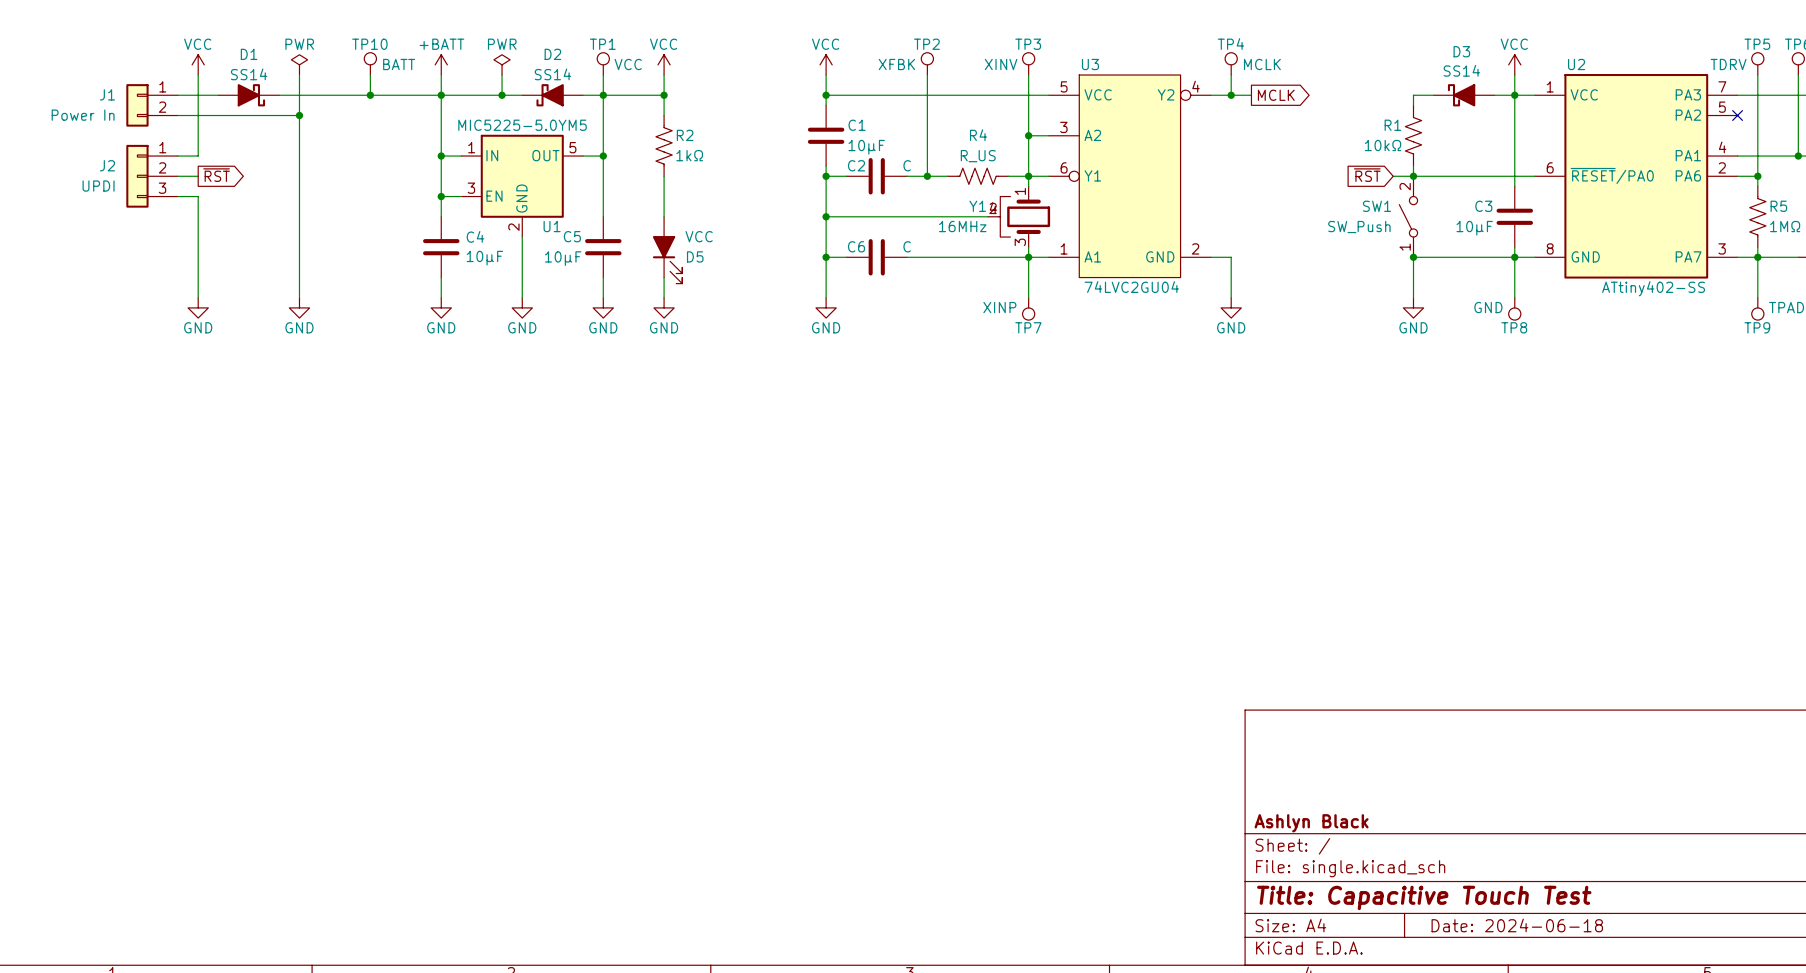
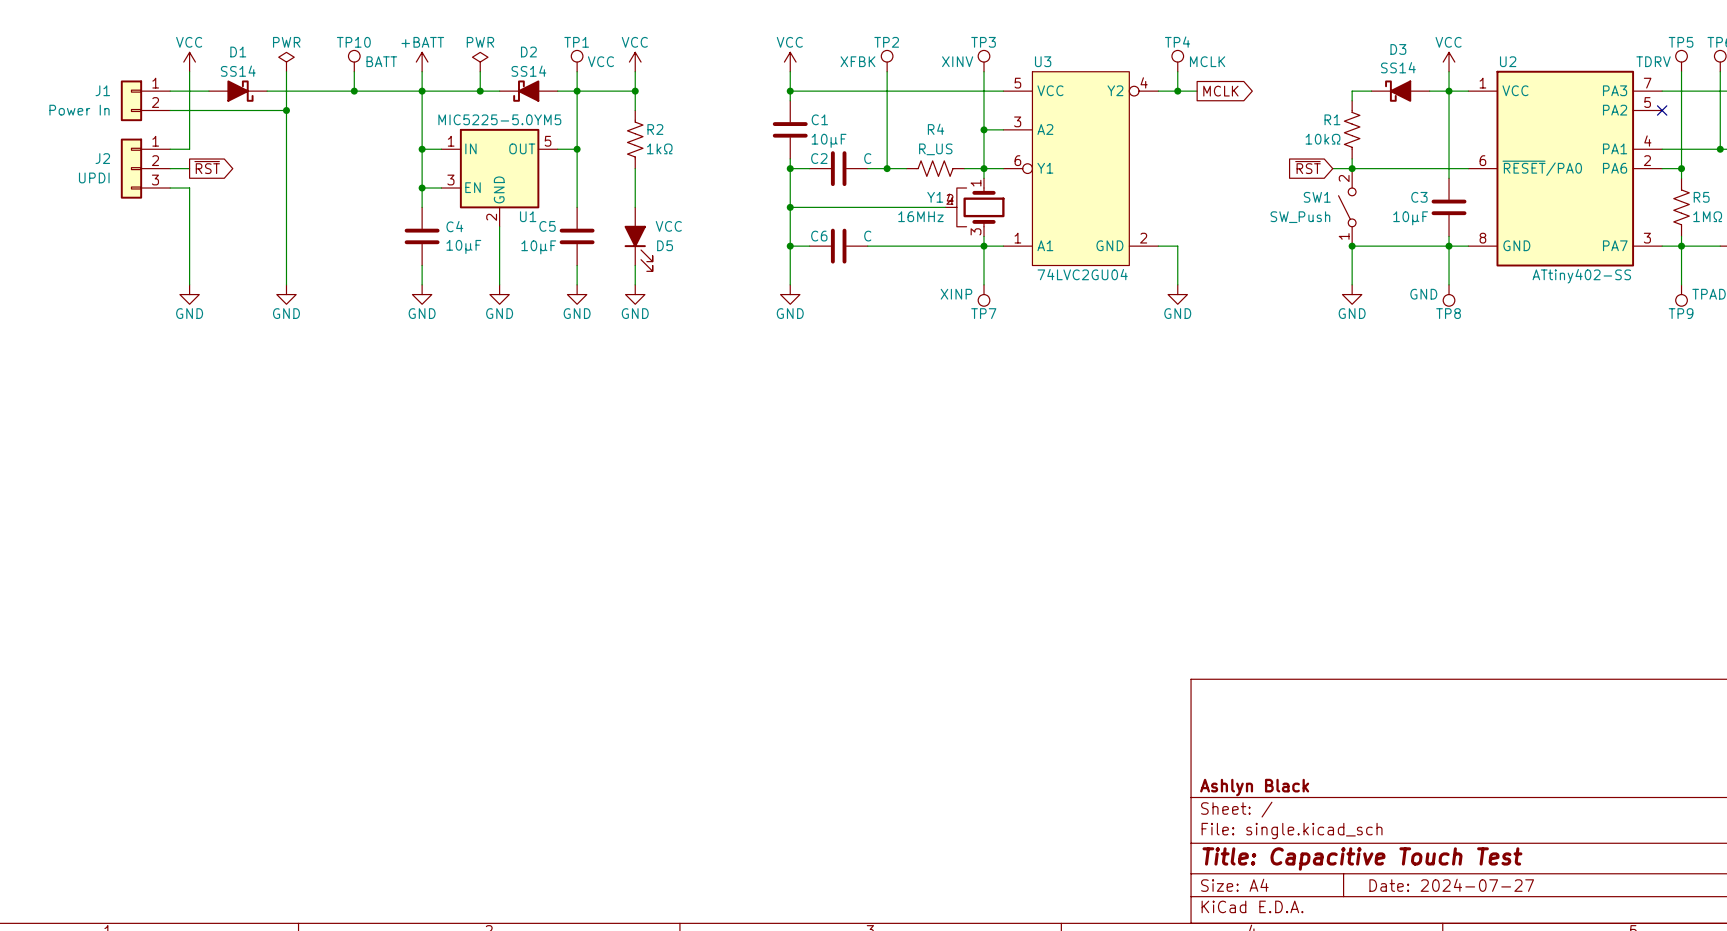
title block: Date: 2024-06-18 (1517, 925) -> Date: 2024-07-27 (1451, 885)

